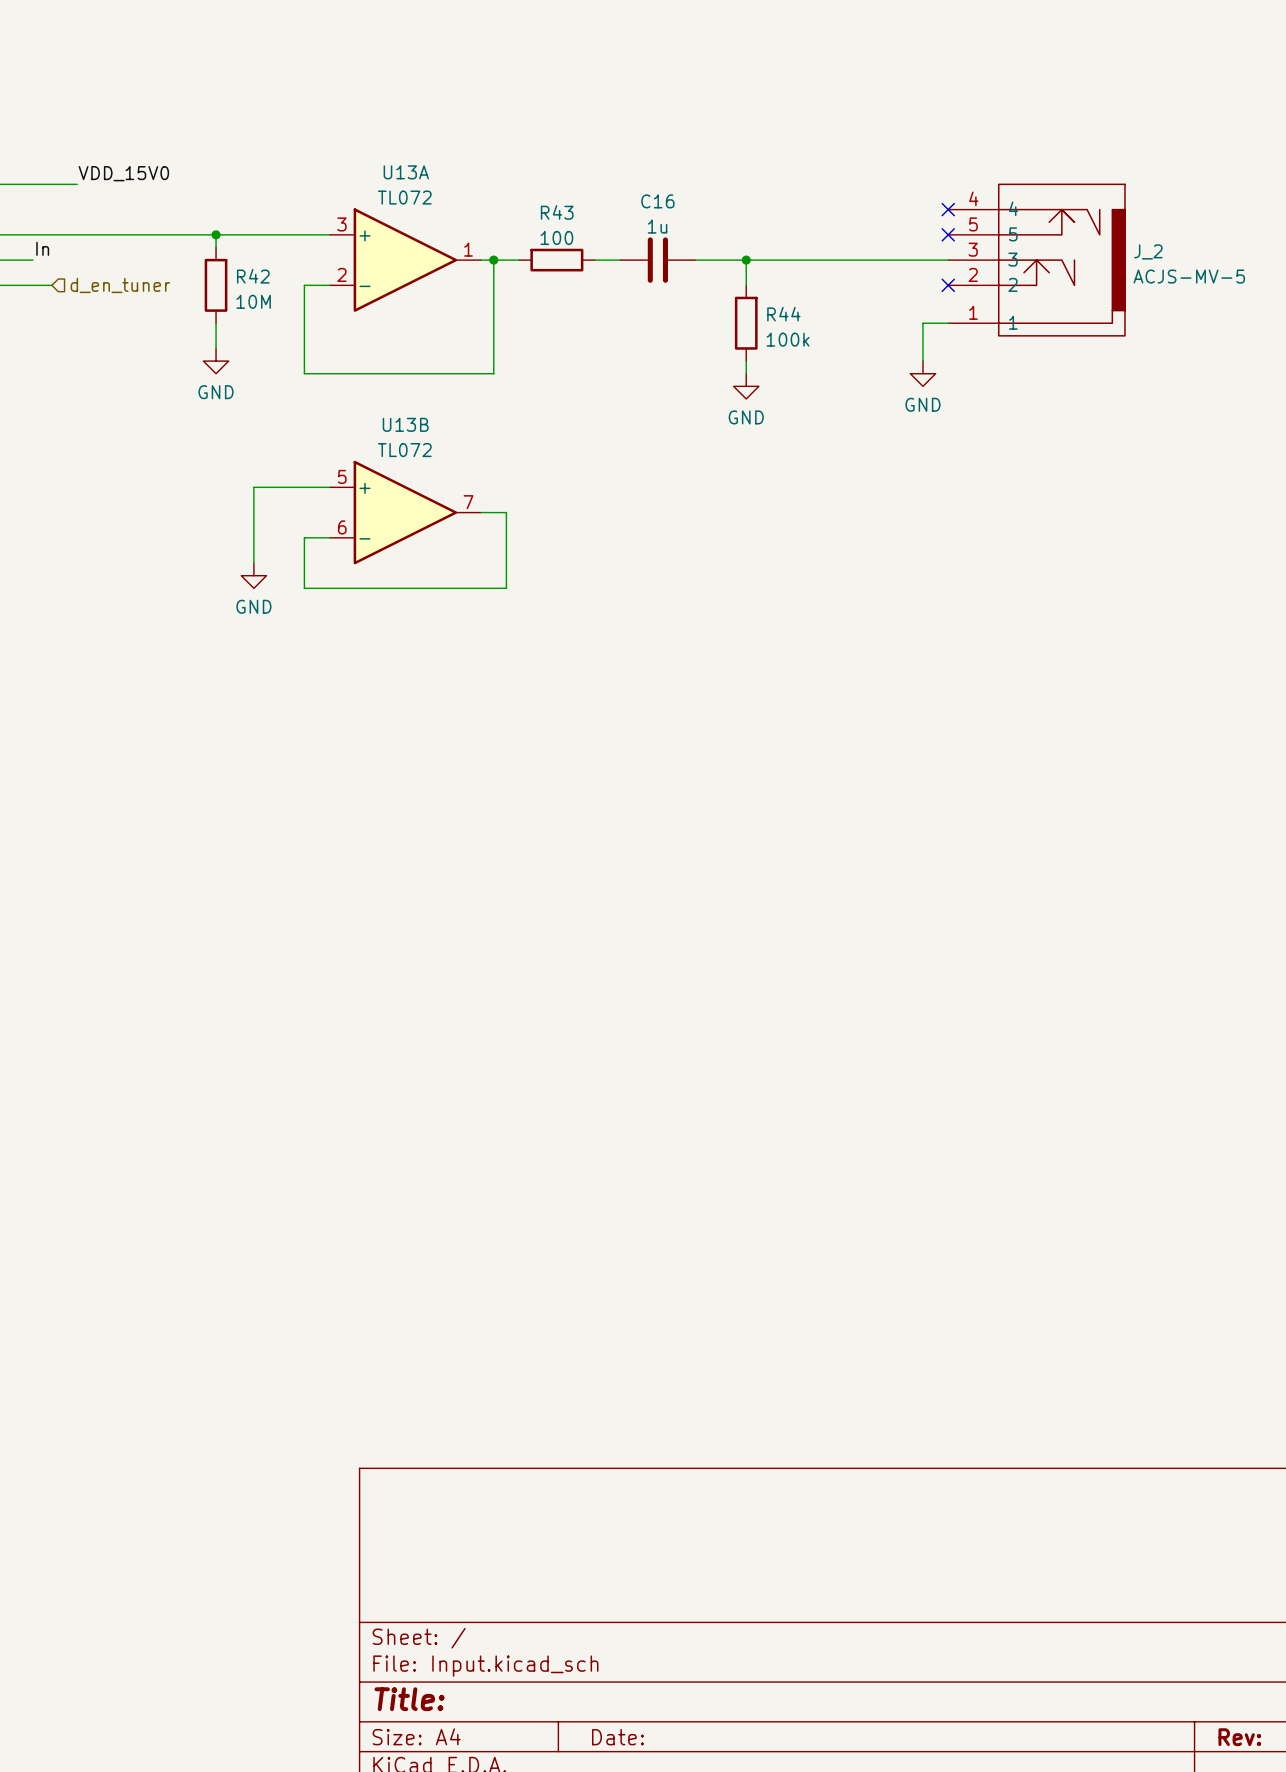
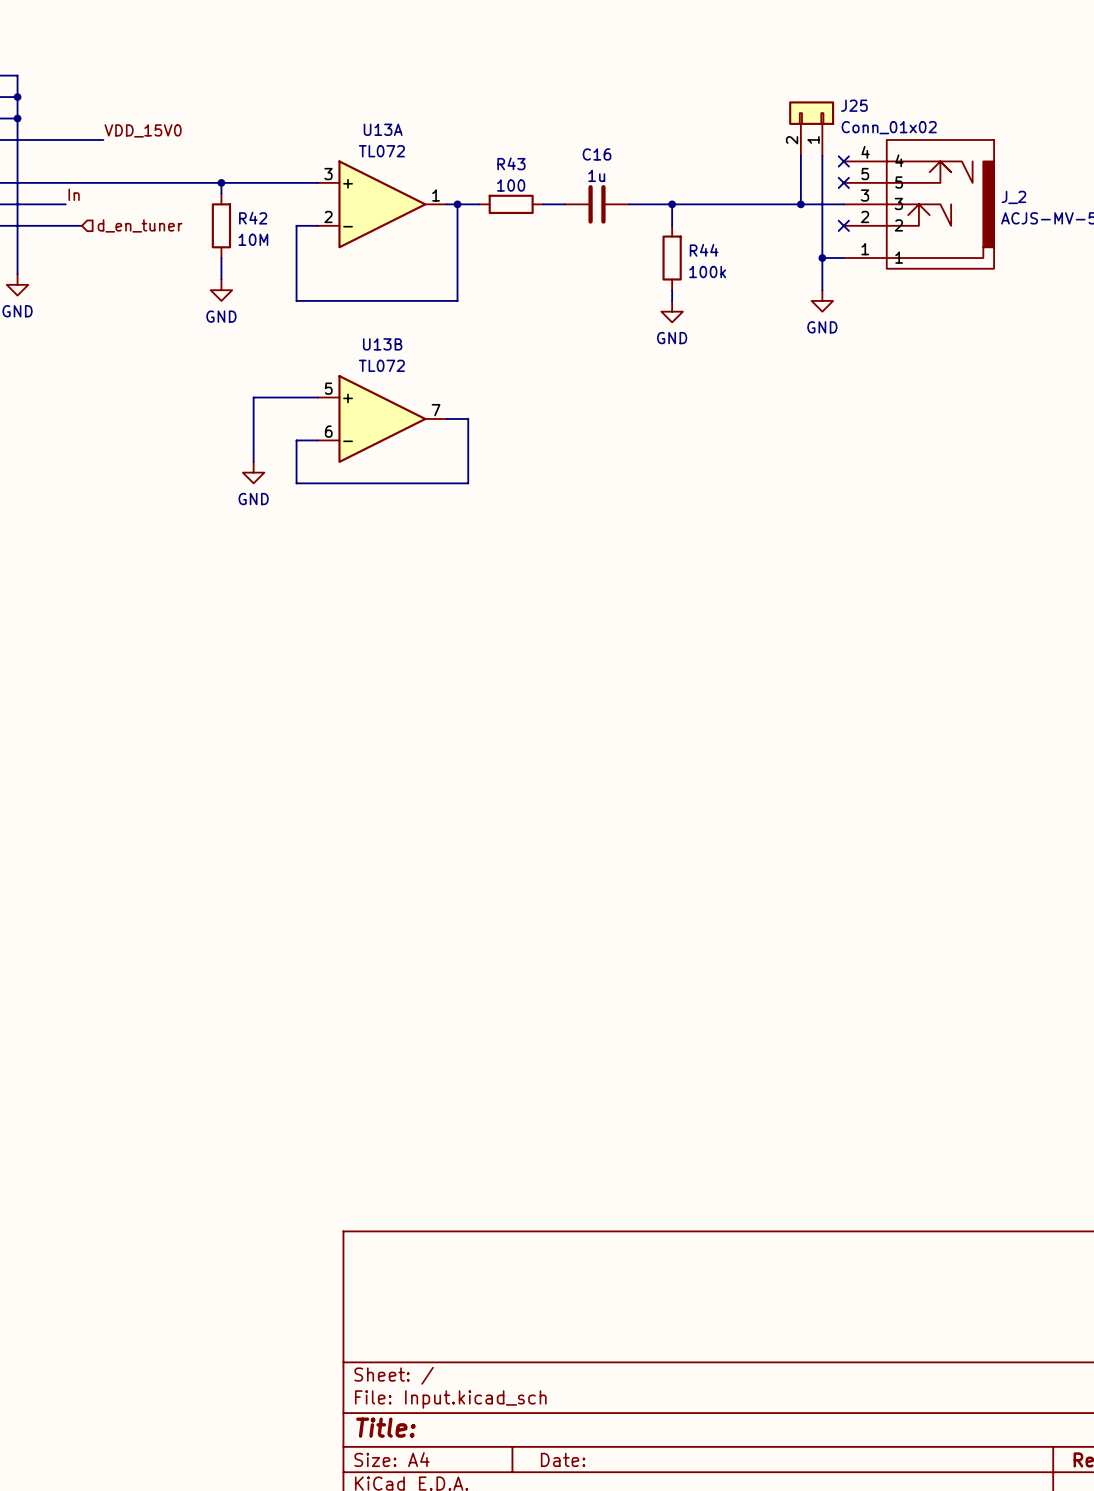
J25: none -> Conn_01x02 (811, 128)
wire: none -> (800, 156) (800, 204)
wire: none -> (822, 156) (822, 258)
junction: none -> (800, 204)
junction: none -> (822, 258)

